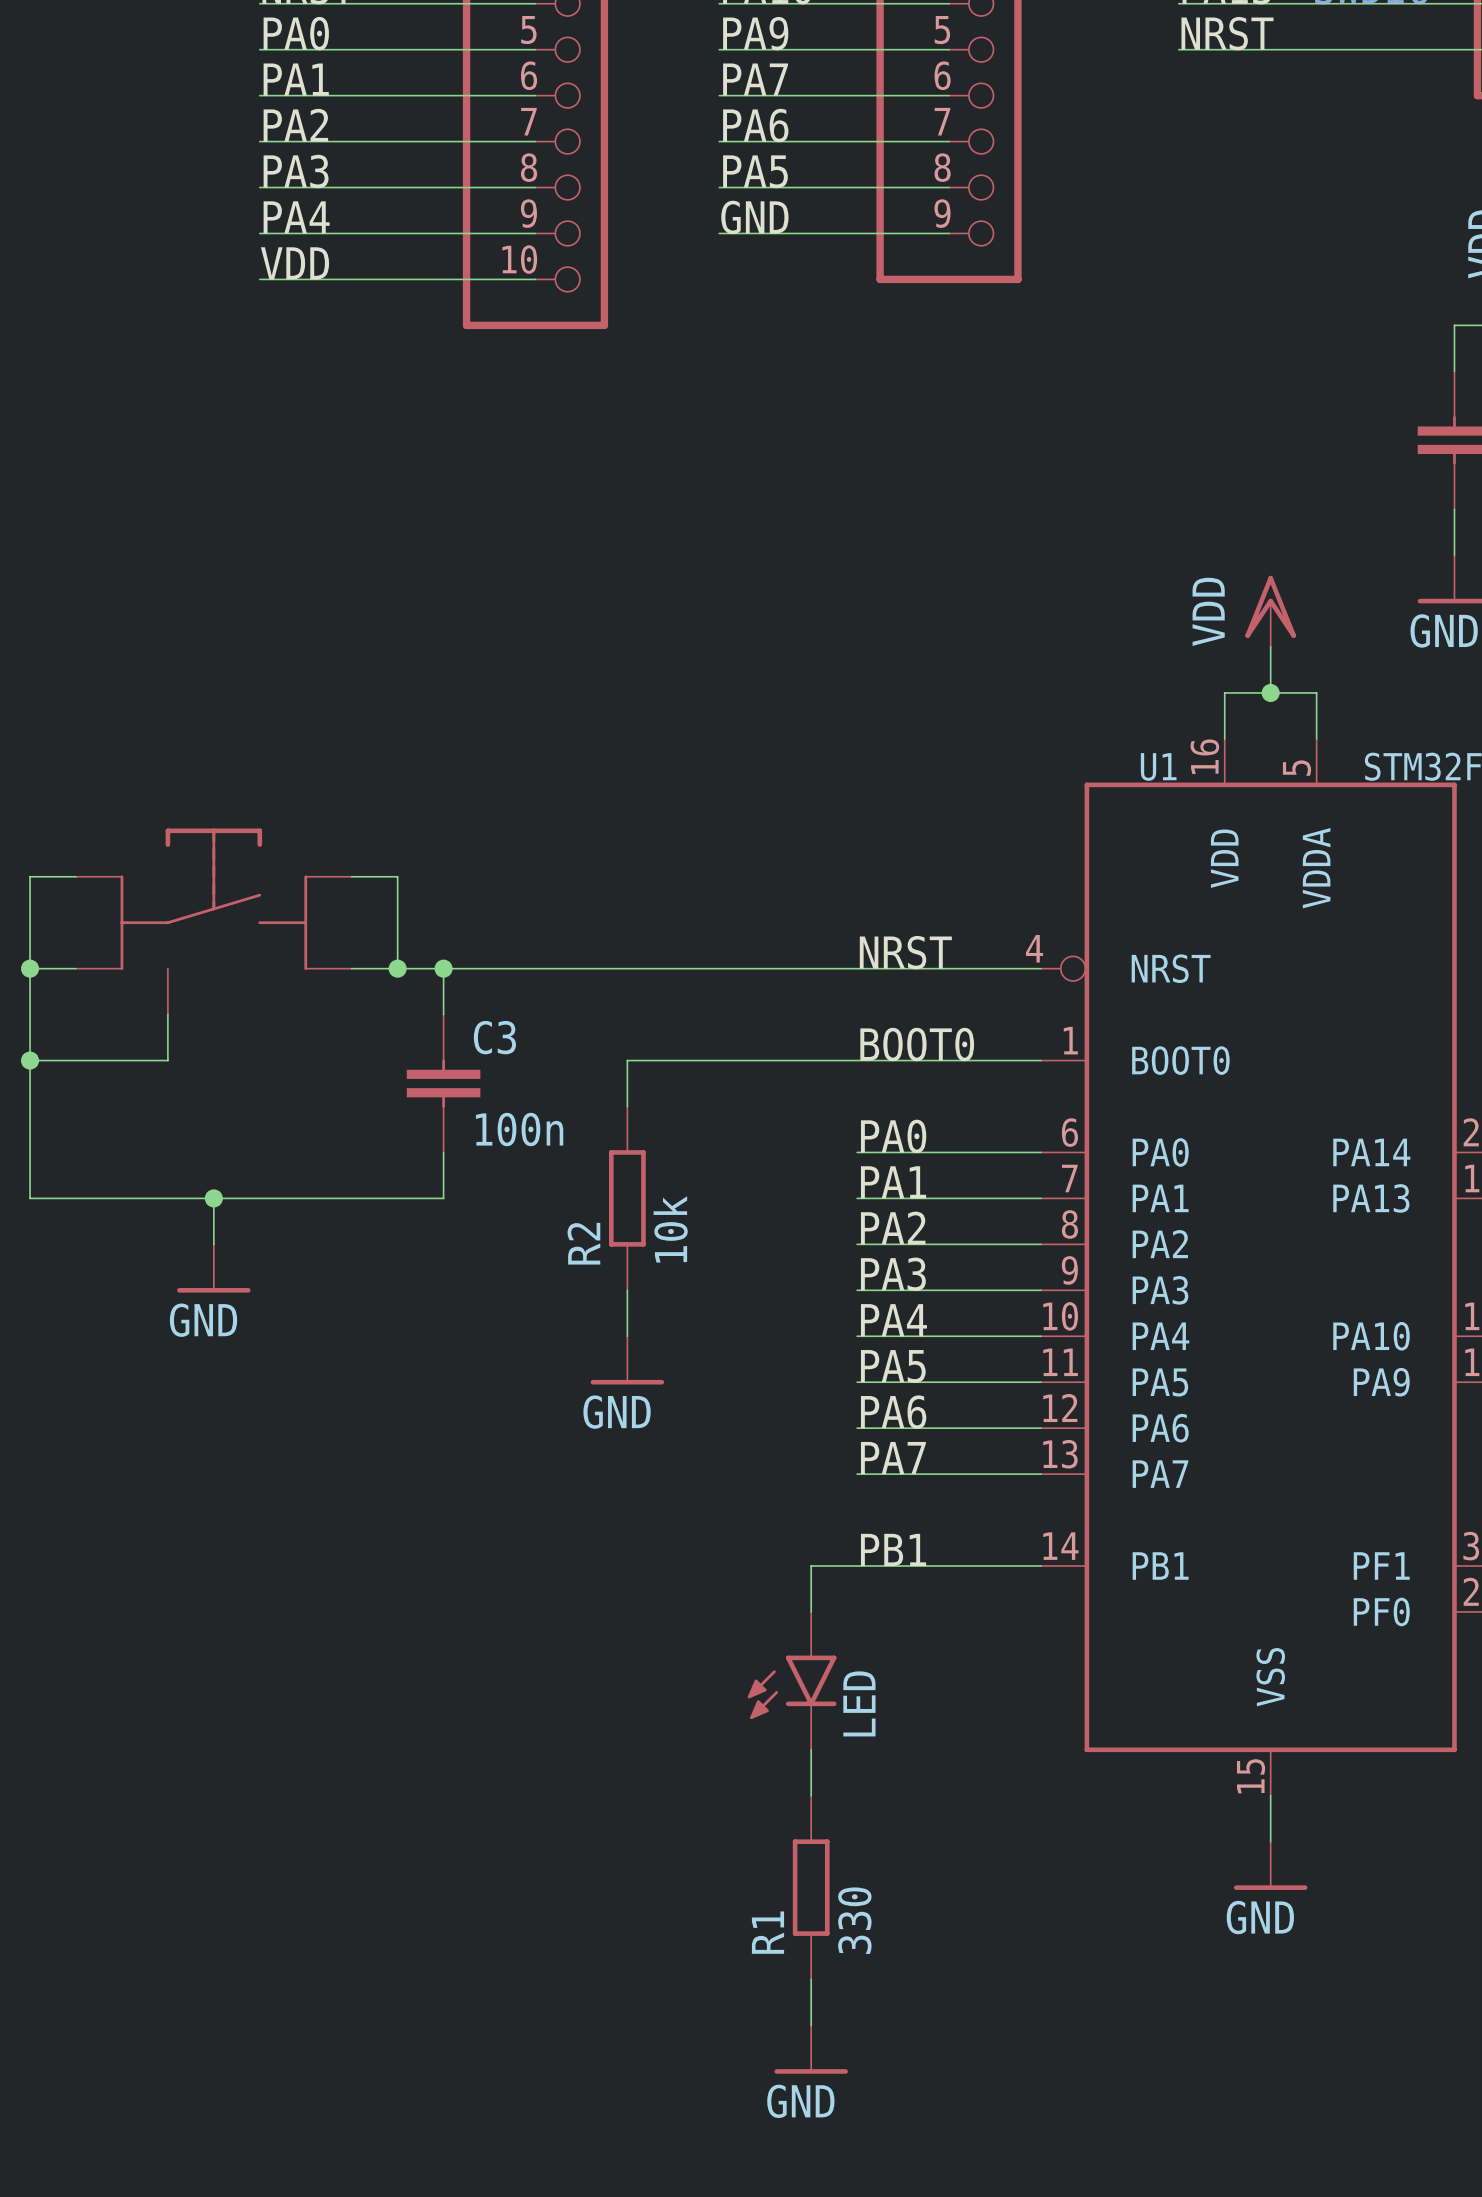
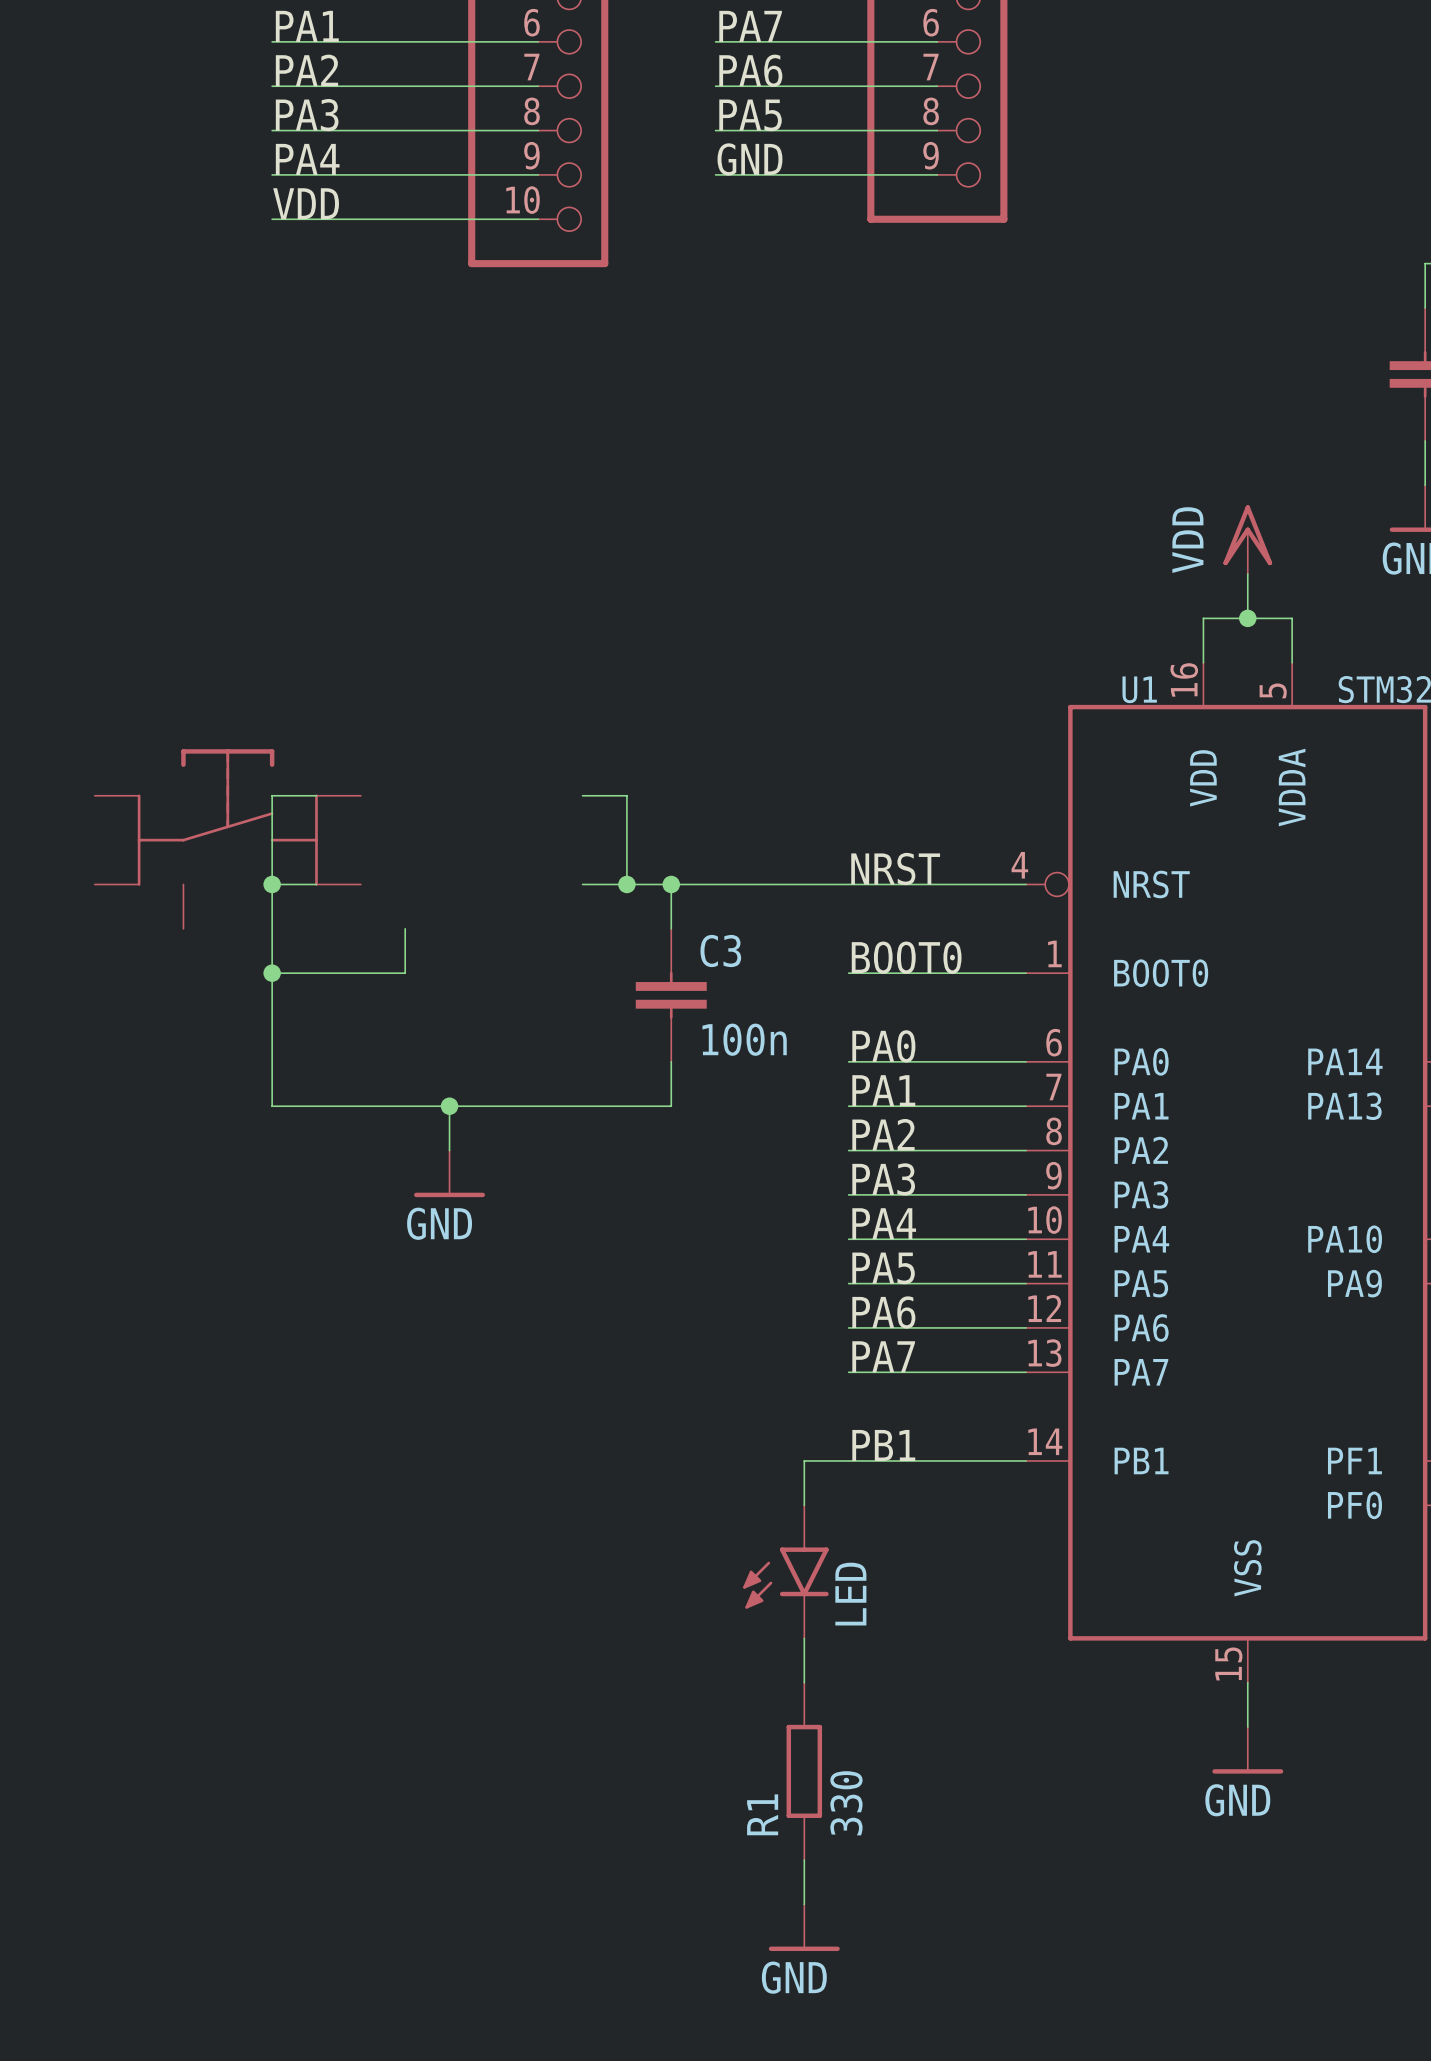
wire: (75, 876) (30, 876) (30, 1198) (259, 1198) -> (316, 795) (272, 795) (272, 1106)
wire: (351, 876) (397, 876) (397, 968) -> (582, 795) (626, 795) (626, 884)
wire: (30, 968) (75, 968) -> (272, 884) (316, 884)
junction: (30, 968) -> none
junction: none -> (272, 884)
wire: (351, 968) (581, 968) -> none
junction: (397, 968) -> none
wire: (443, 968) (443, 1014) -> (671, 884) (671, 928)
junction: (443, 968) -> none
junction: none -> (626, 884)
junction: none -> (671, 884)
wire: (167, 1014) (167, 1060) (30, 1060) -> (405, 928) (405, 973) (272, 973)
junction: (30, 1060) -> none
junction: none -> (272, 973)
wire: (857, 1060) (627, 1060) (627, 1106) -> none
C3 position: (443, 1083) -> (671, 995)
wire: (443, 1152) (443, 1198) -> none
wire: none -> (671, 1061) (671, 1106) (449, 1106) (449, 1150)
wire: (213, 1198) (213, 1244) -> none
junction: (213, 1198) -> none
junction: none -> (449, 1106)
R2: 10k (627, 1198) -> none
power symbol: GND (213, 1268) -> none
power symbol: none -> GND (449, 1173)
wire: (627, 1290) (627, 1336) -> none
power symbol: GND (627, 1360) -> none

